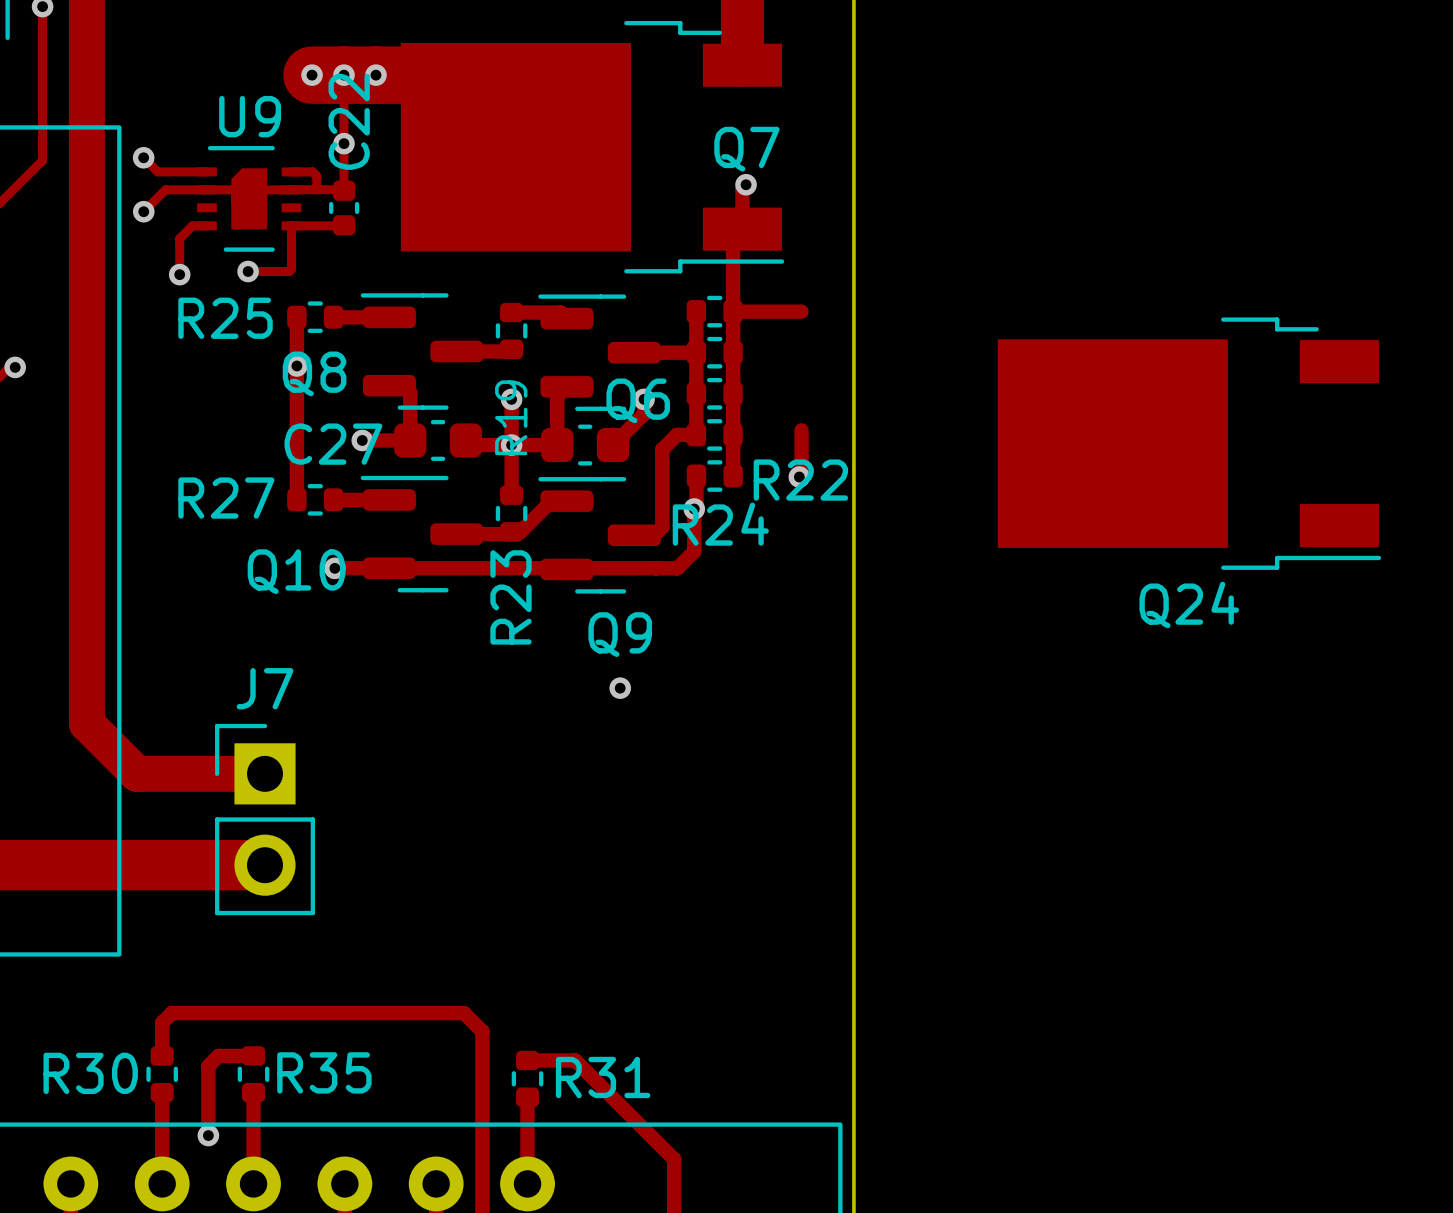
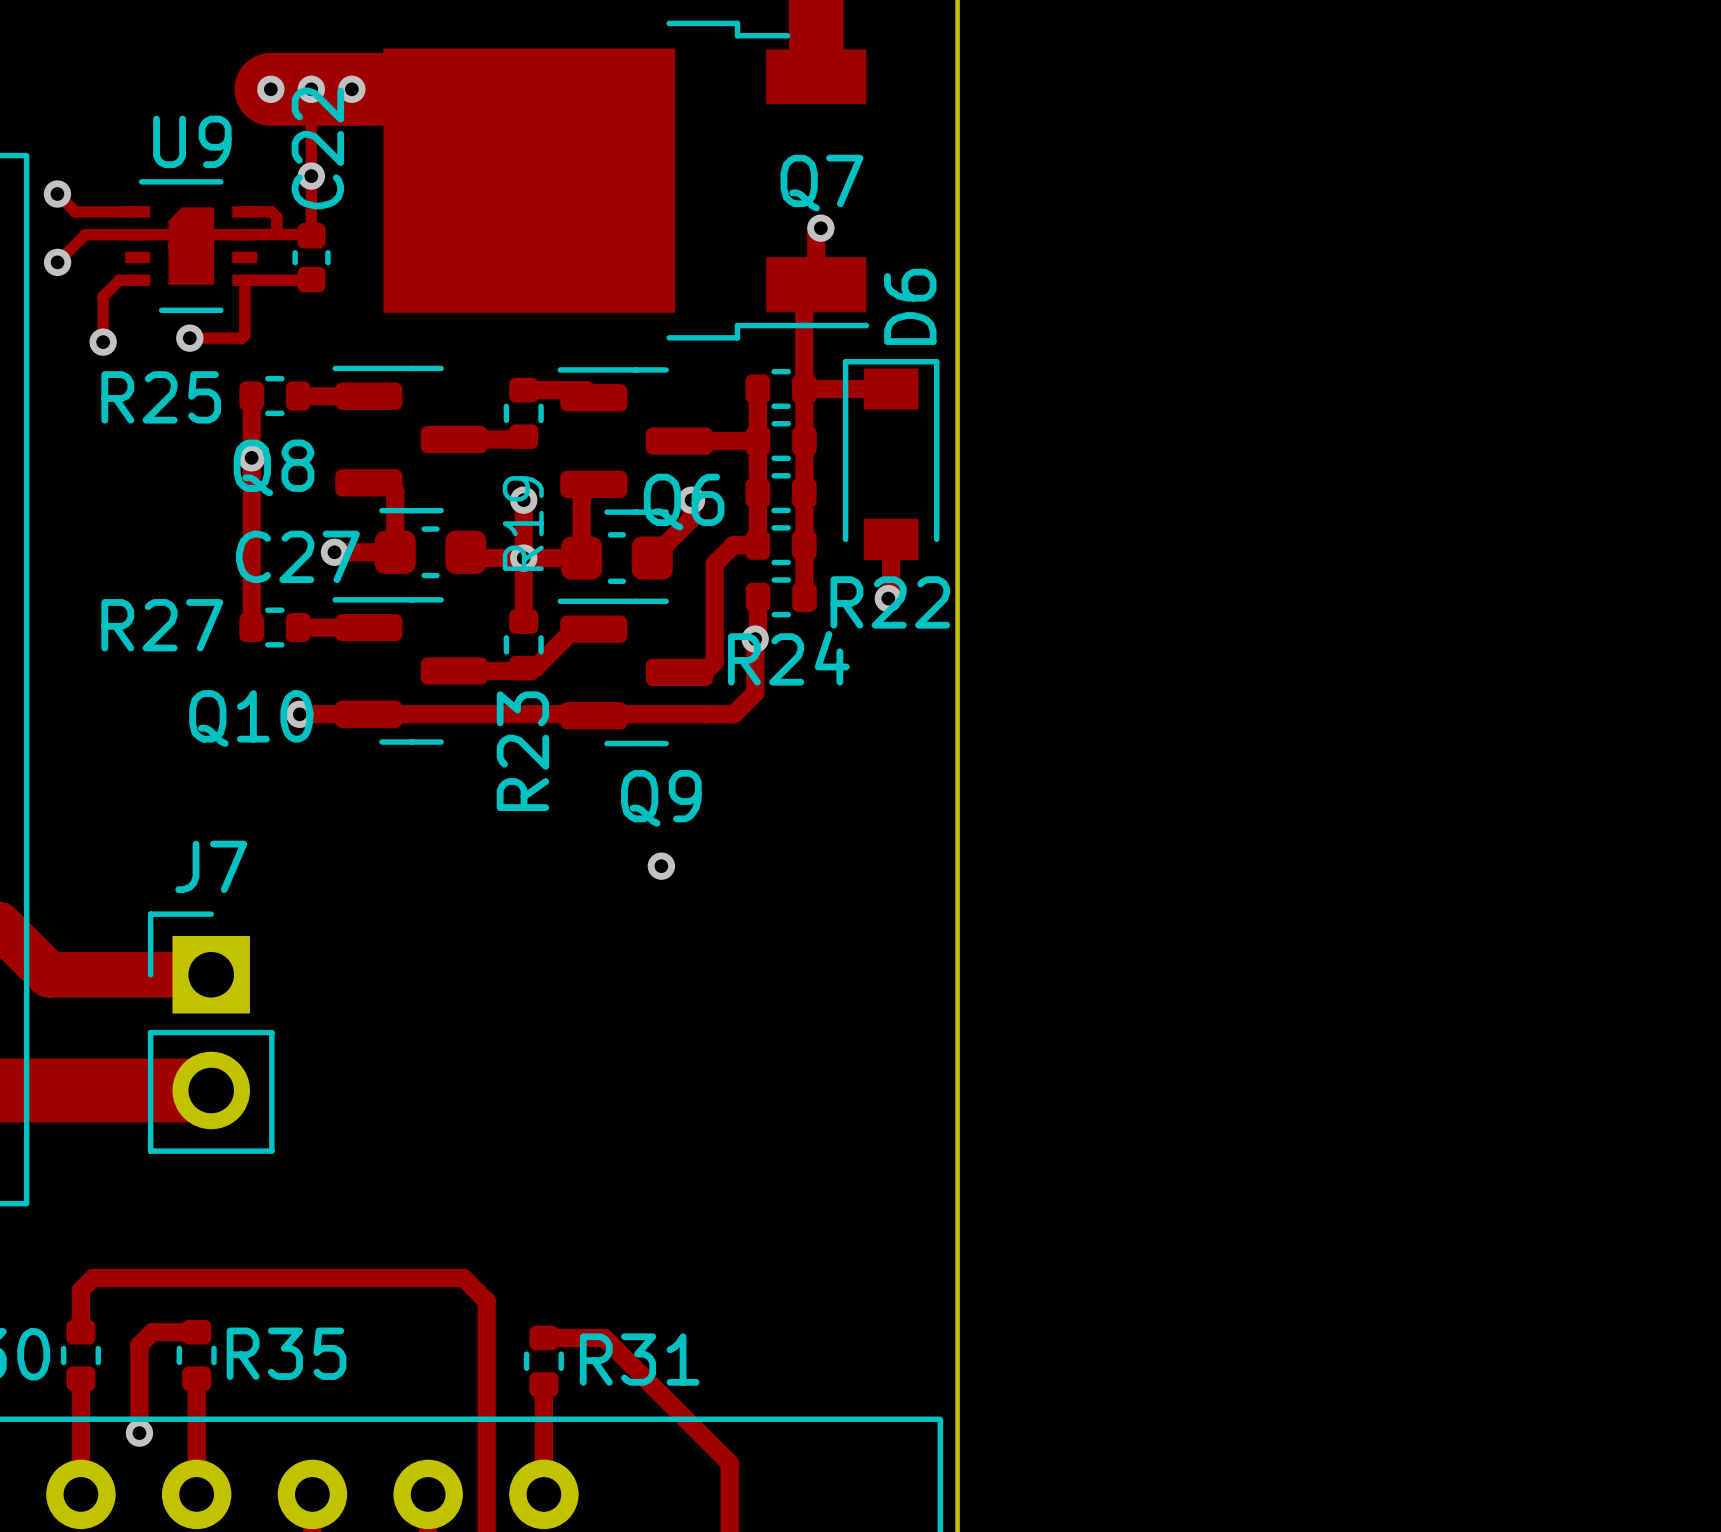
D6: none -> (891, 459)
Q24: (1189, 443) -> none

